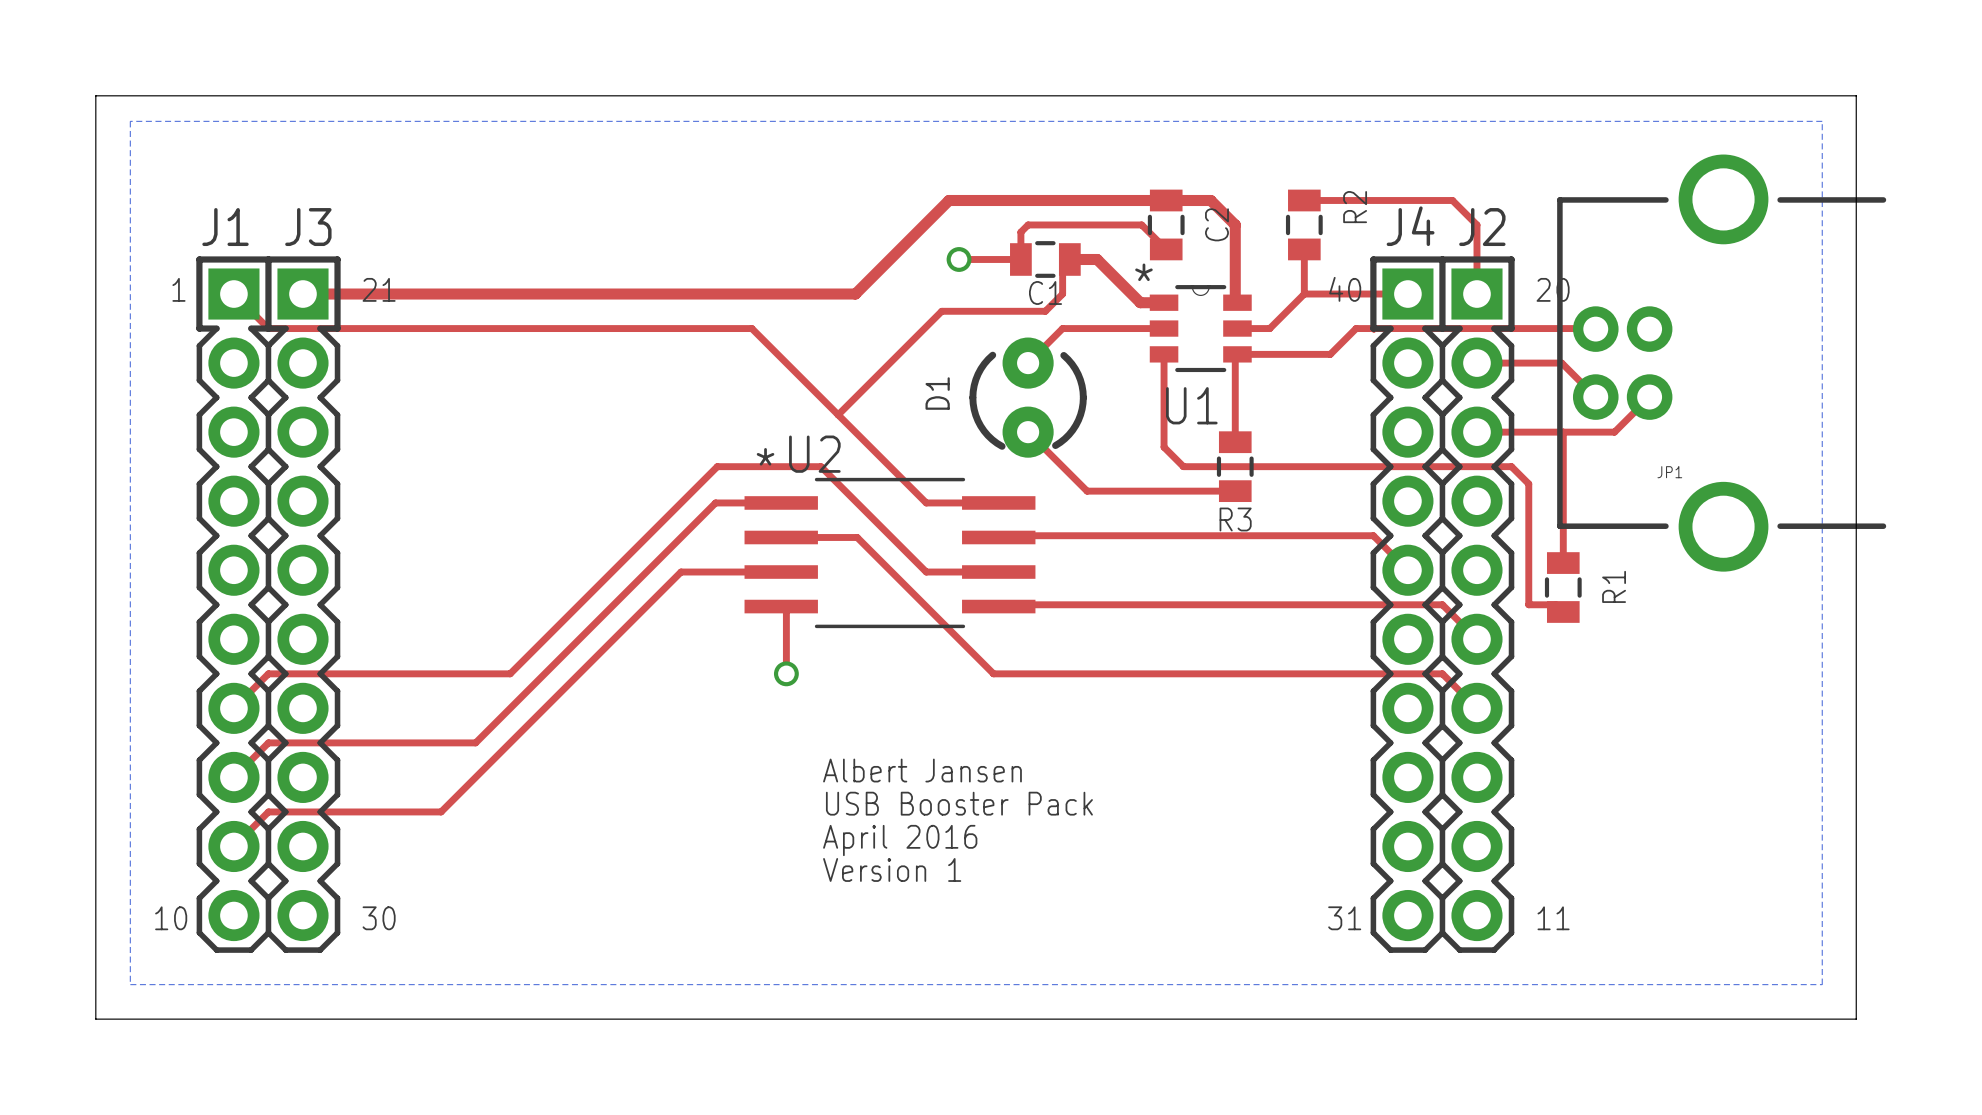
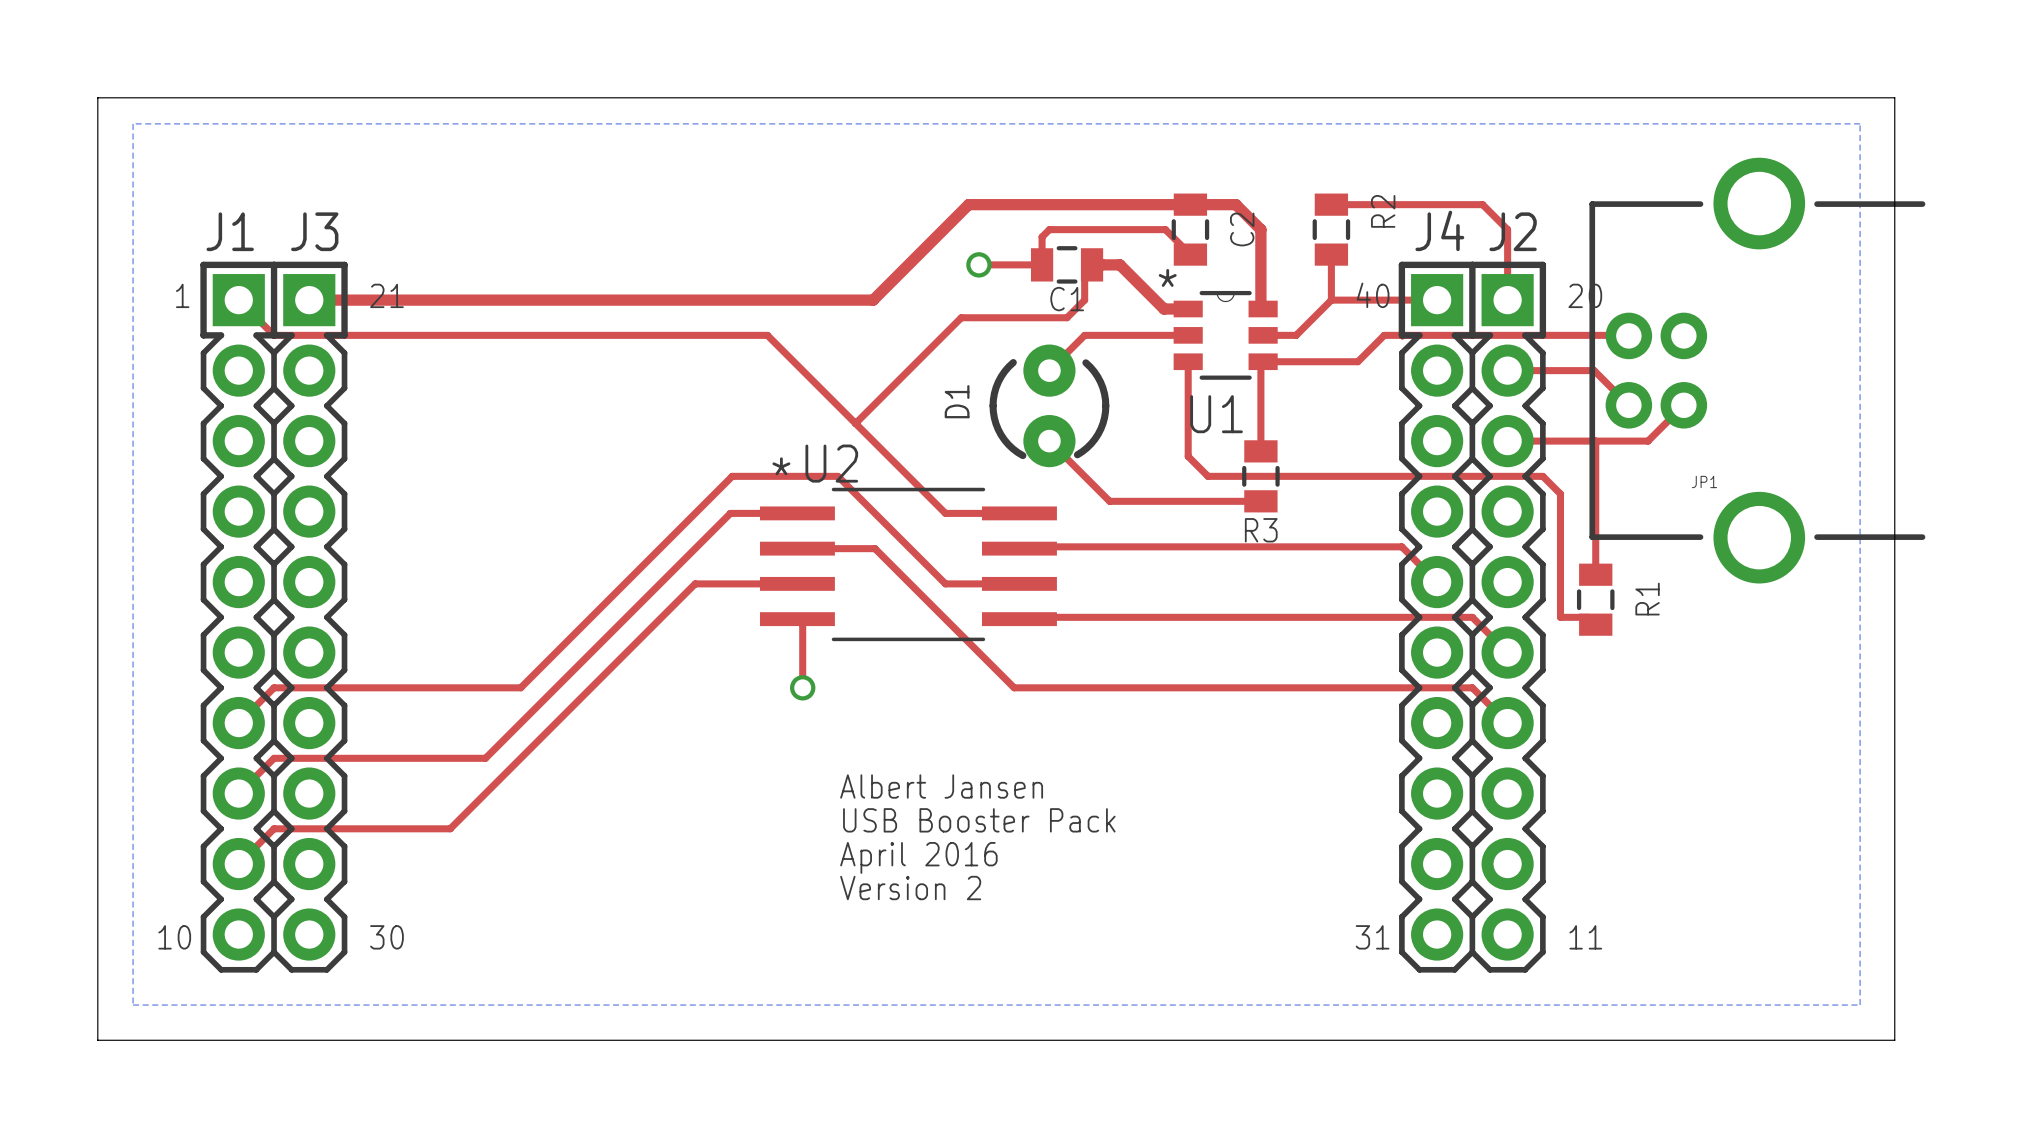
text: Version 1 (892, 869) -> Version 2 (910, 888)

